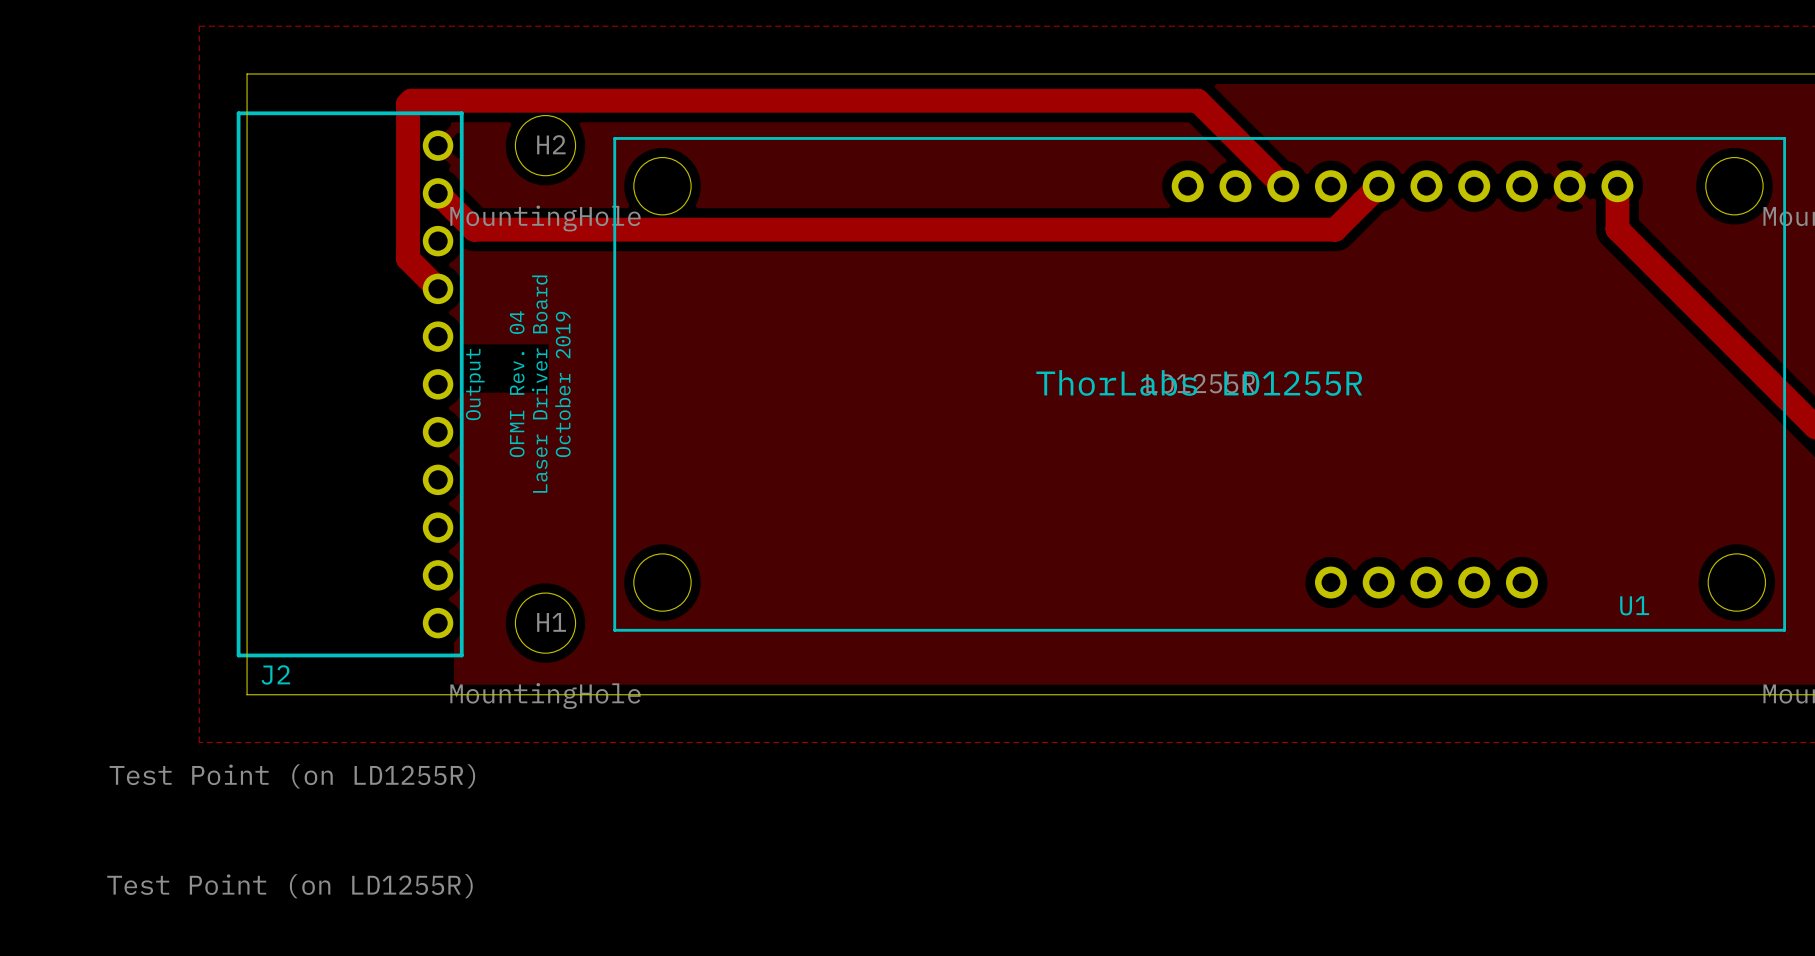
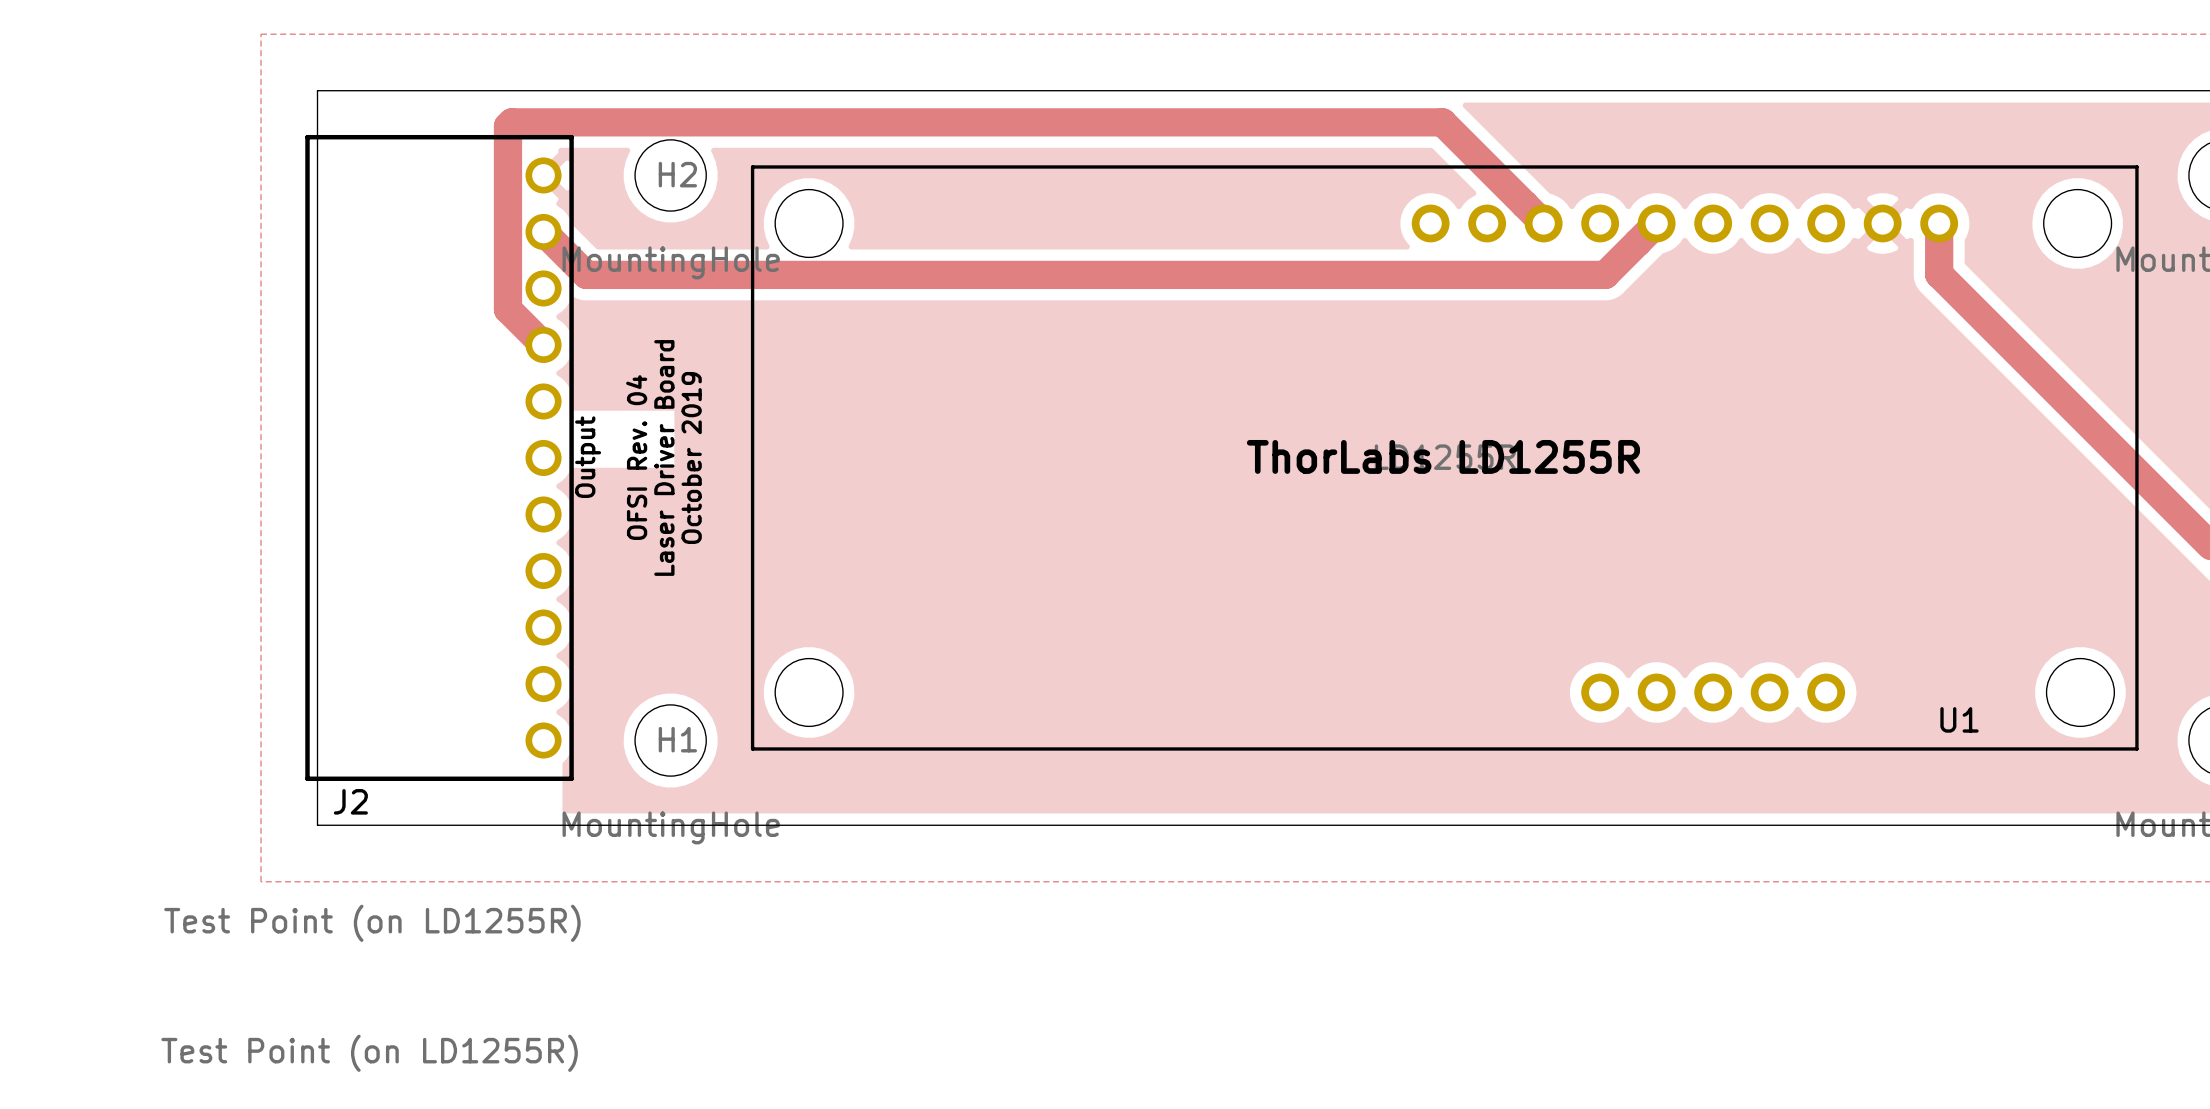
text: OFMI Rev. 04 (517, 384) -> OFSI Rev. 04 (636, 457)

